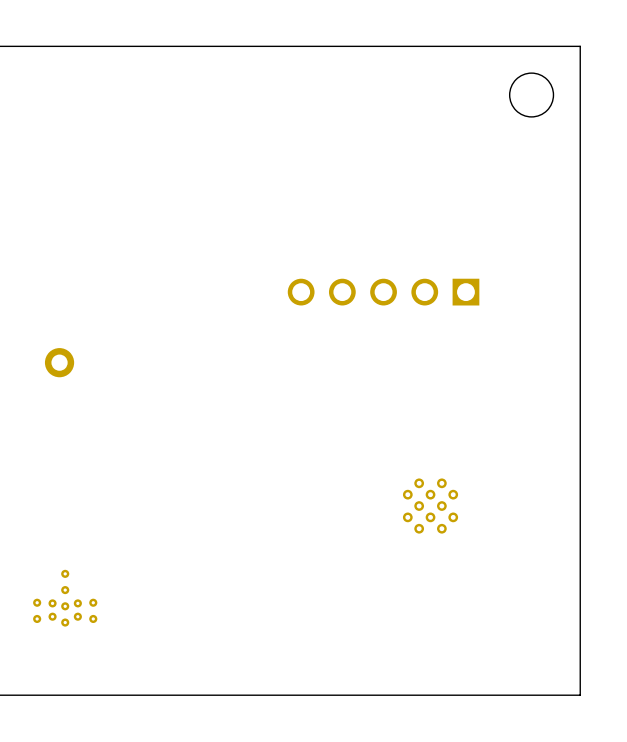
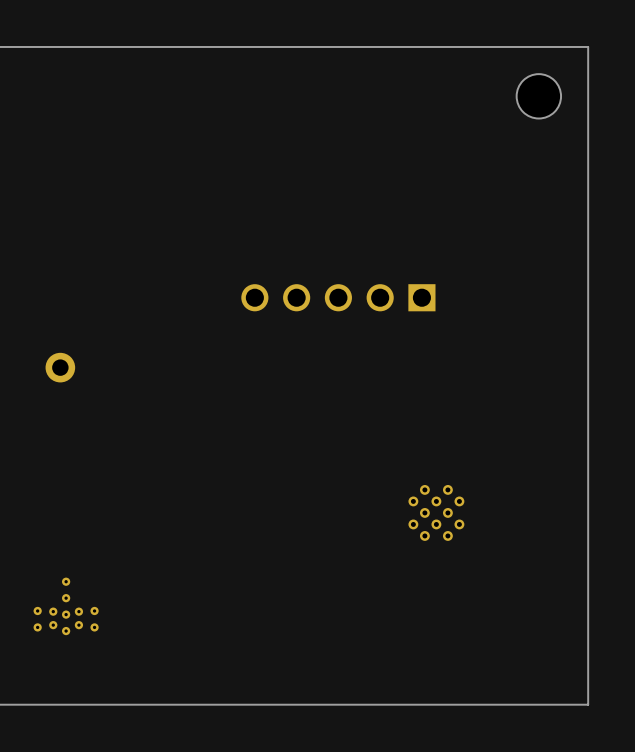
part position: (383, 292) -> (338, 297)

